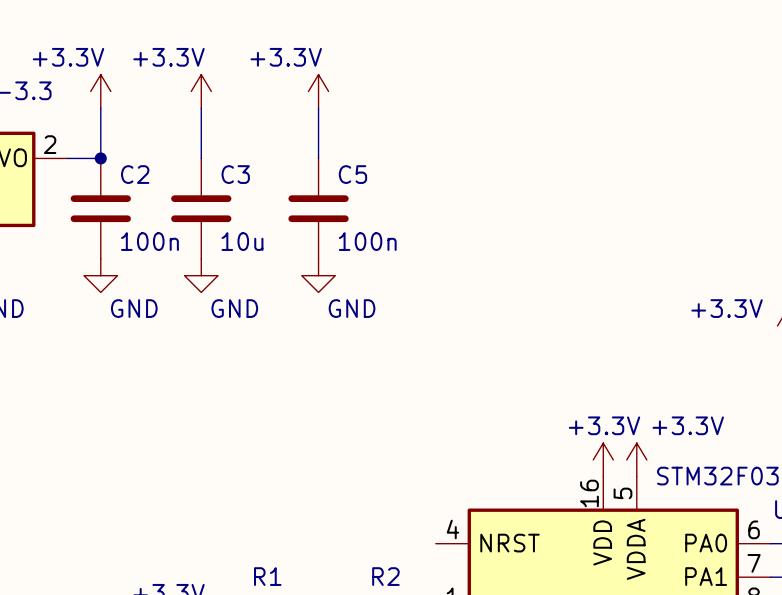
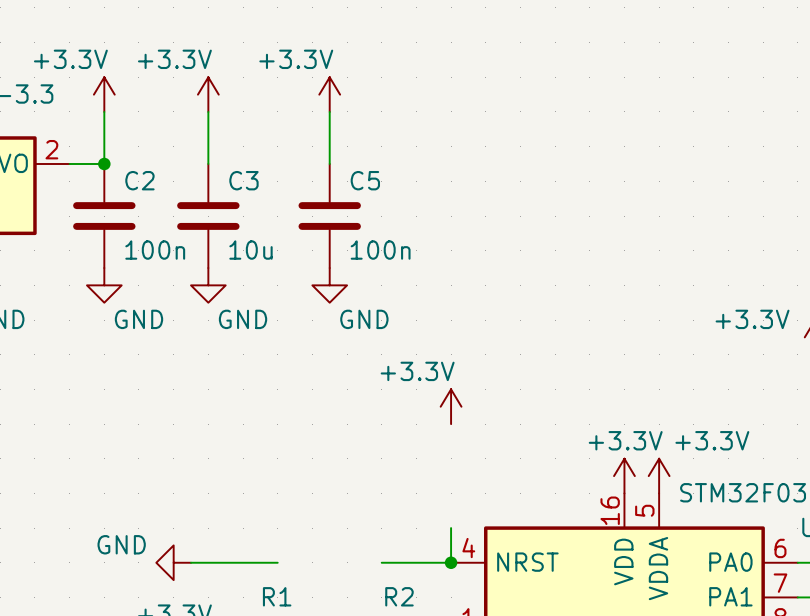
power symbol: none -> +3.3V (451, 406)
wire: none -> (451, 528) (451, 562) (381, 562)
power symbol: none -> GND (173, 562)
wire: none -> (191, 562) (277, 562)
junction: none -> (451, 562)

